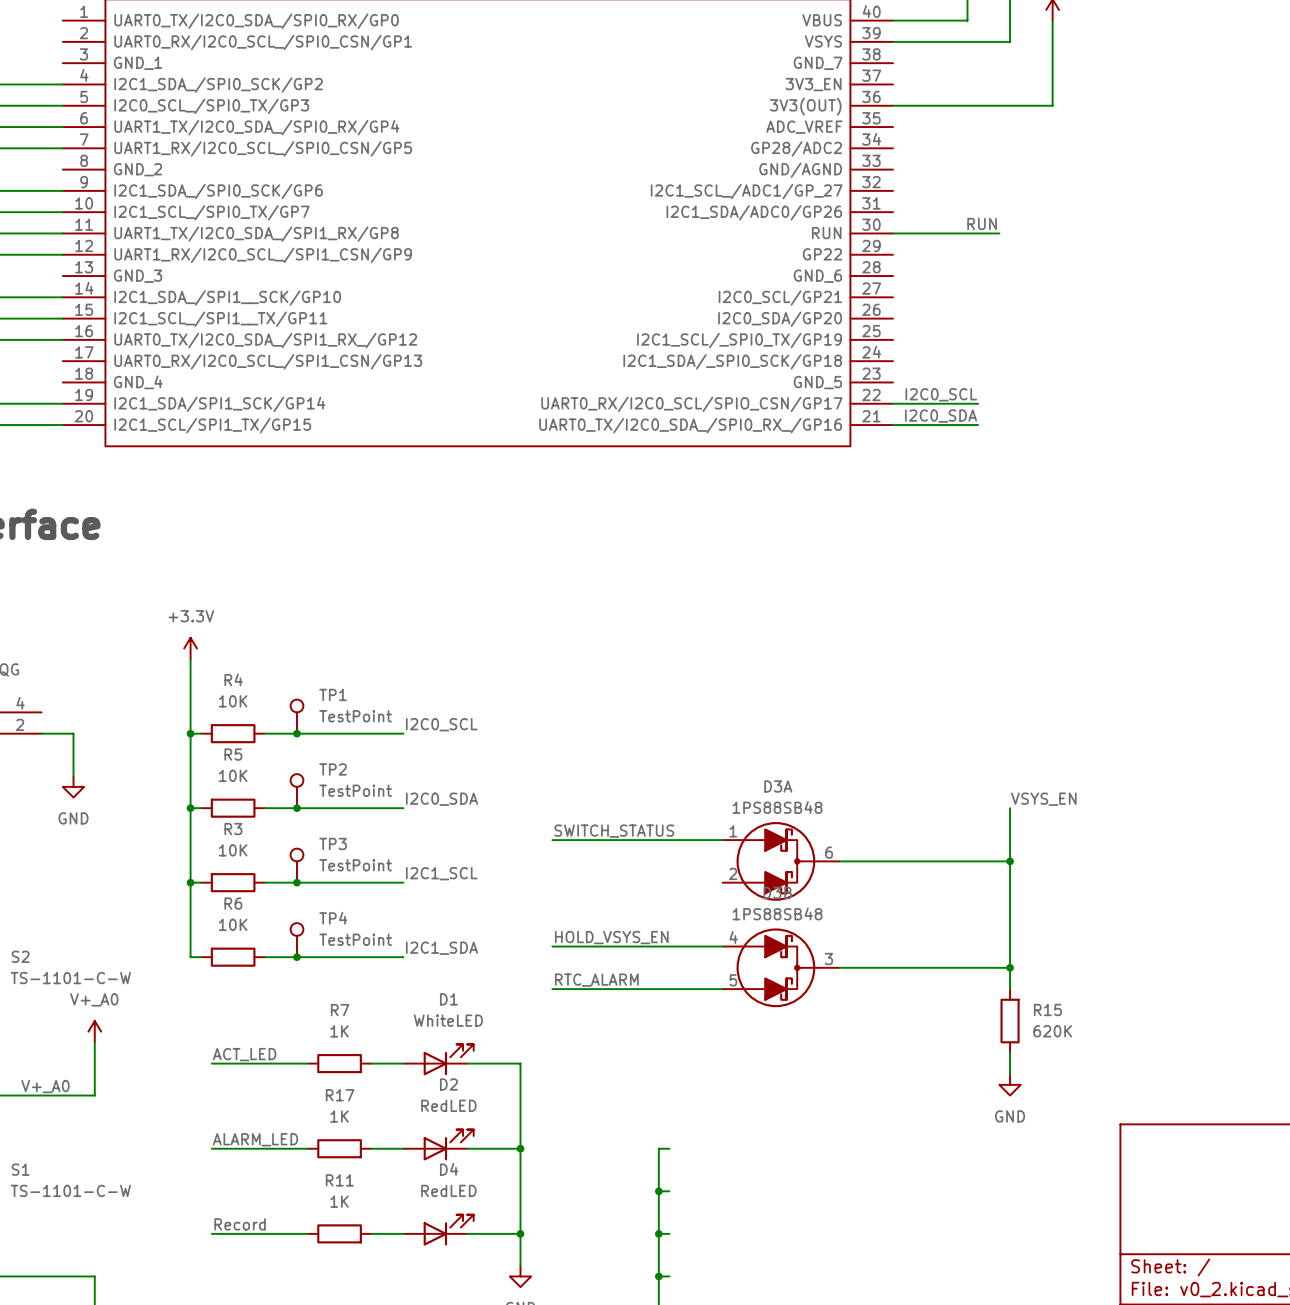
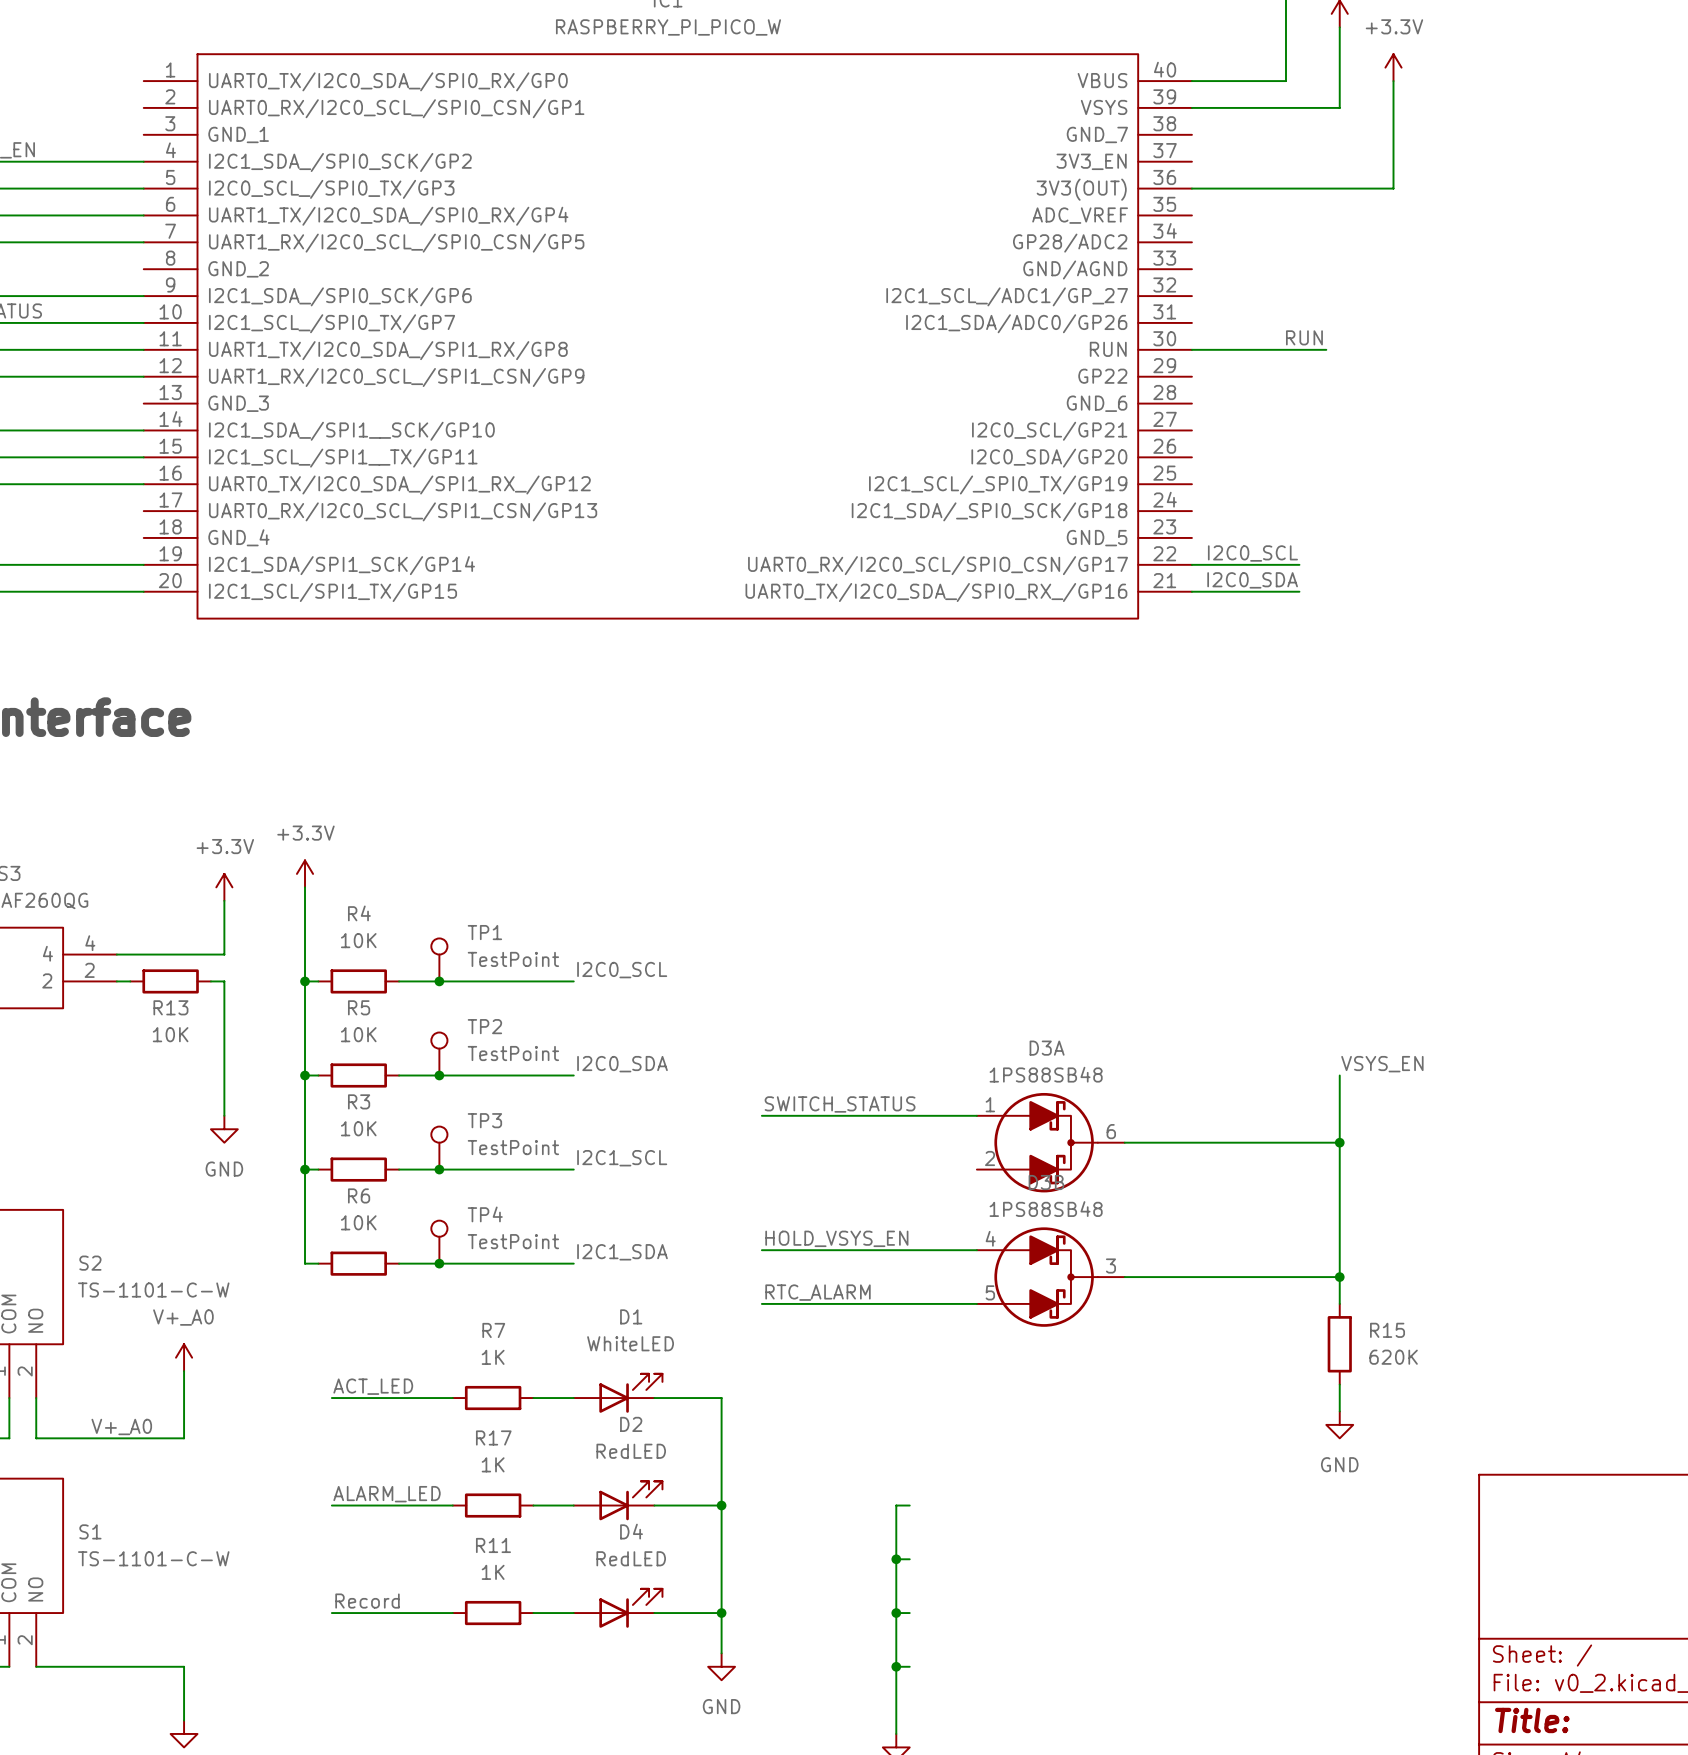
power symbol: none -> +3.3V (224, 887)
wire: none -> (224, 900) (224, 954) (116, 954)
wire: (52, 733) (73, 733) (73, 776) -> none
R13: none -> 10K (170, 981)
wire: none -> (210, 981) (224, 981) (224, 1115)
power symbol position: GND (73, 786) -> GND (224, 1129)

